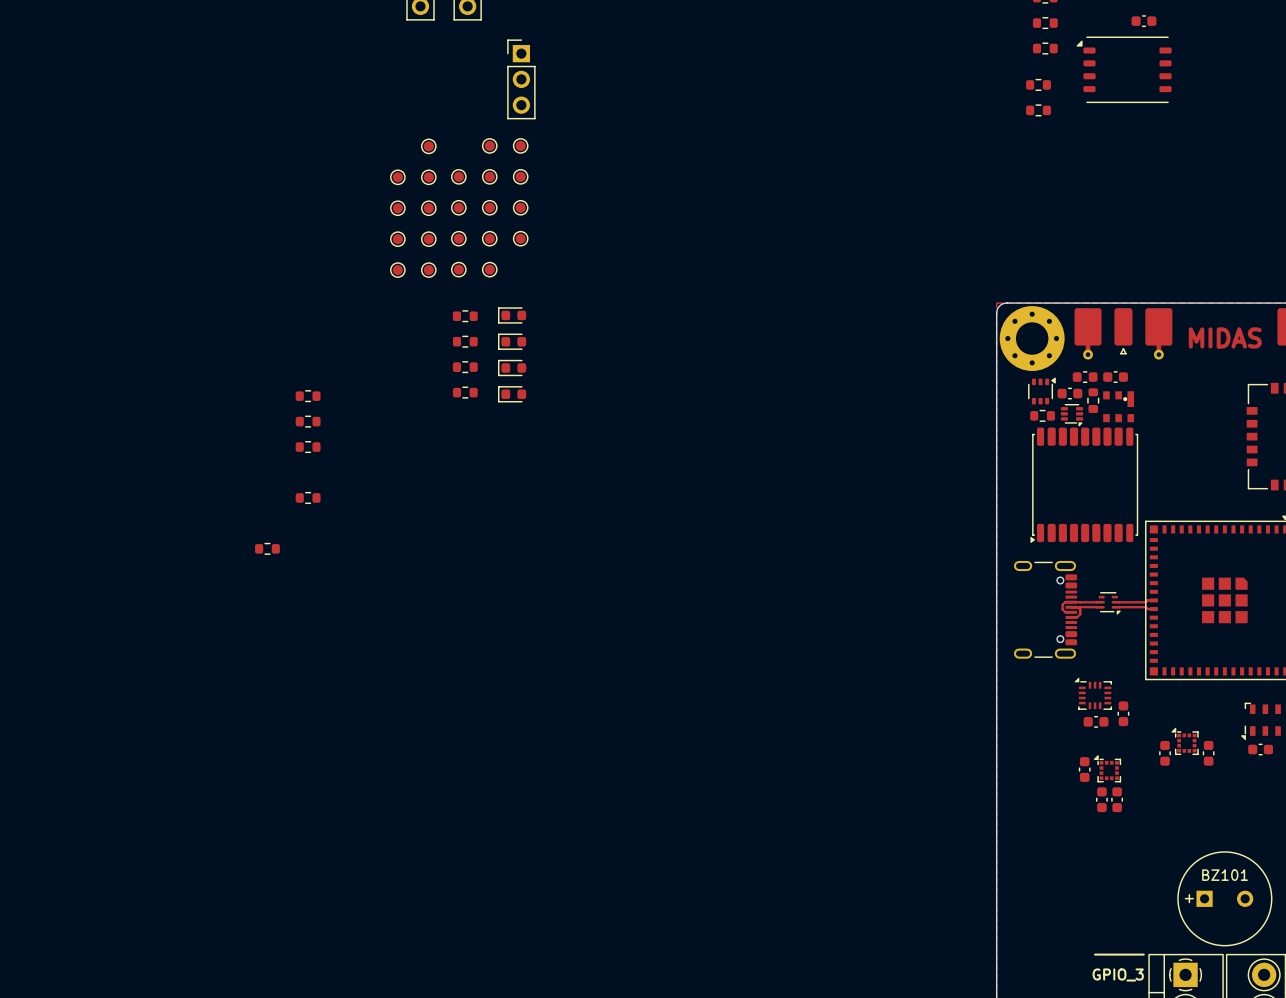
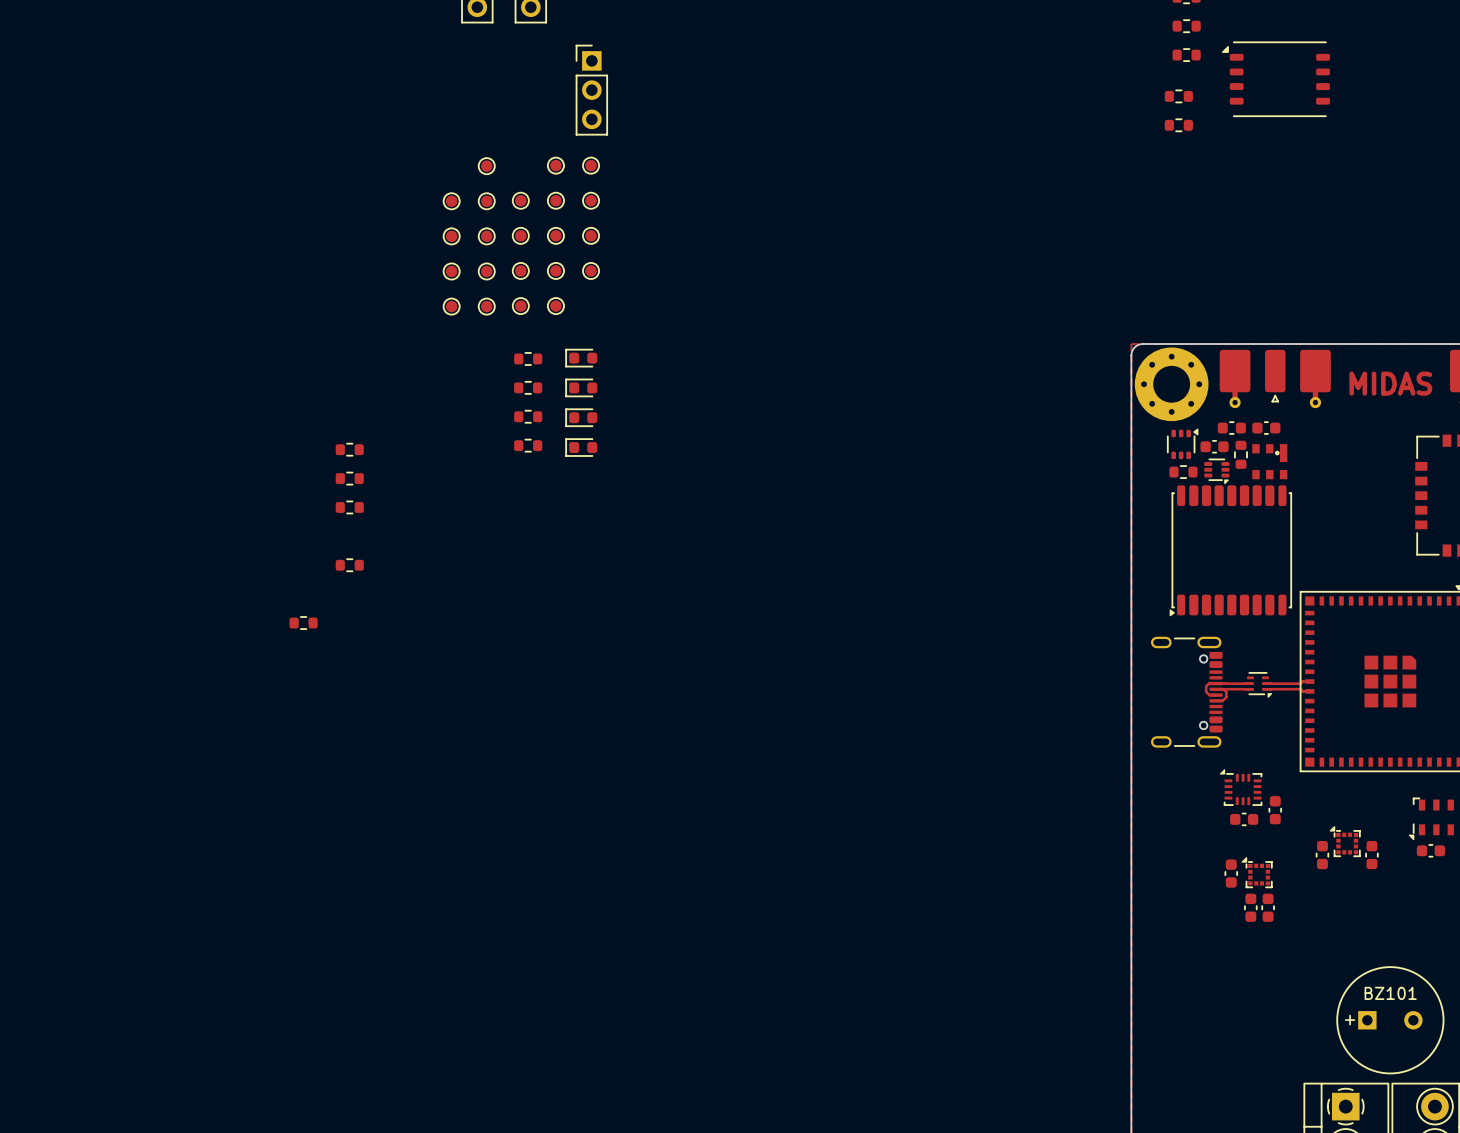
part: (1143, 21) -> none
line: (1095, 954) (1143, 954) -> none
text: GPIO_3 (1118, 974) -> none

